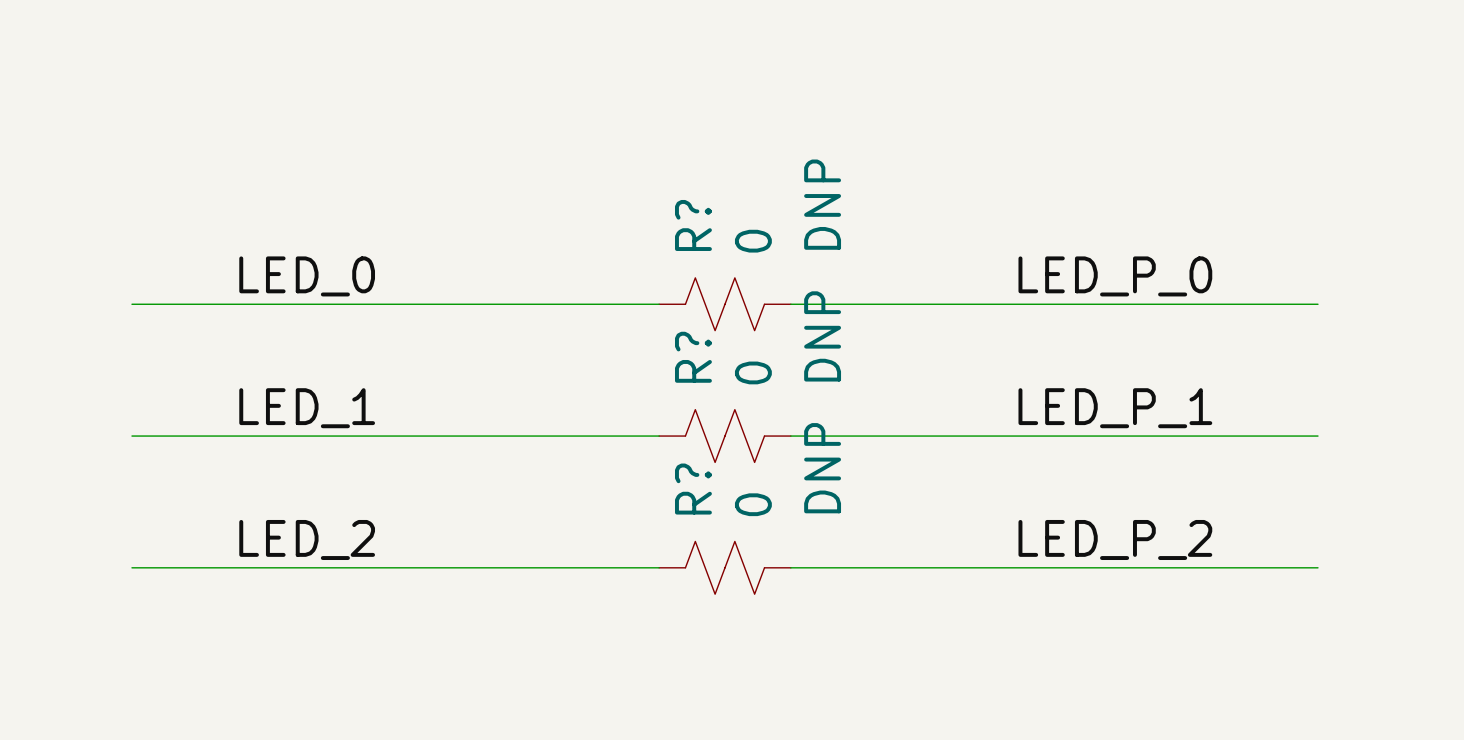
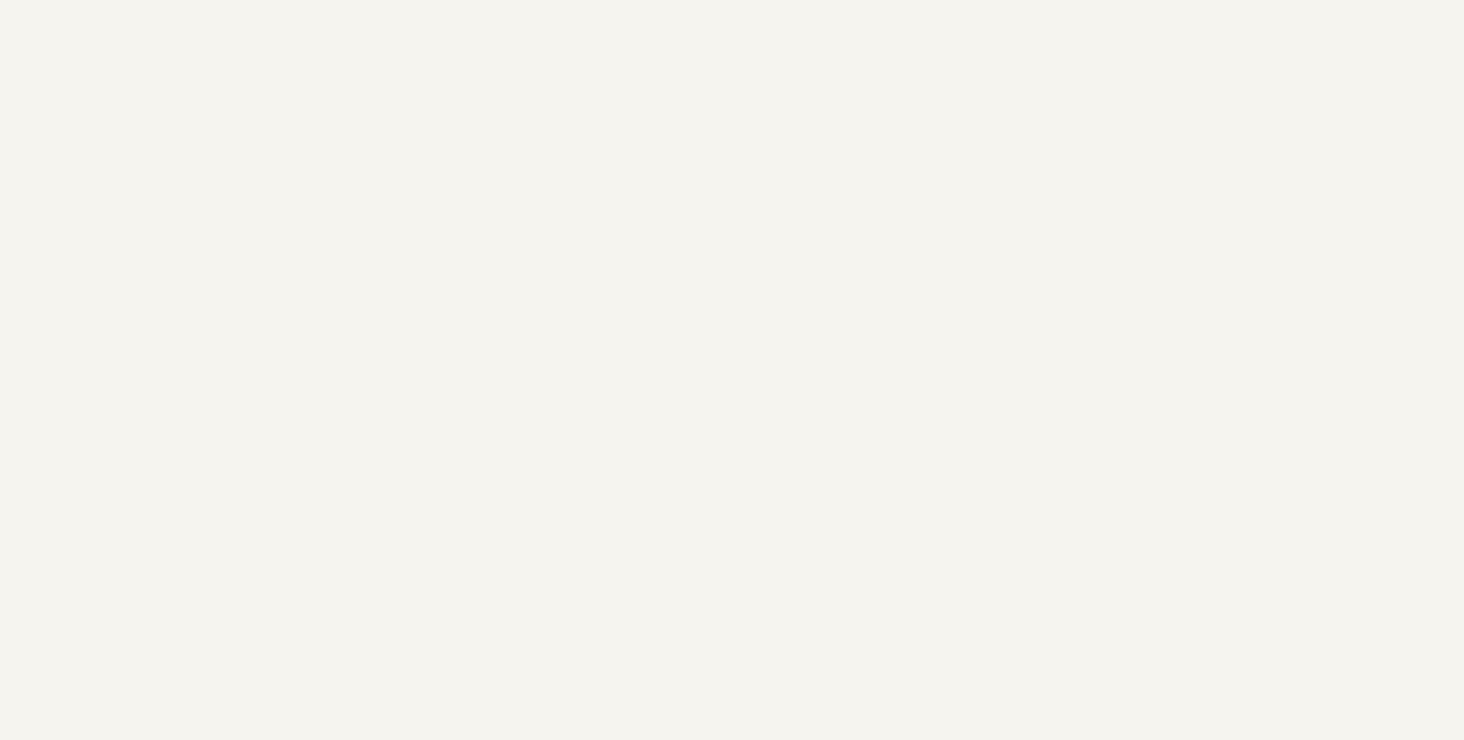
label: LED_0 (307, 276) -> none
label: LED_P_0 (1115, 276) -> none
wire: (131, 304) (659, 304) -> none
R?: 0 (724, 304) -> none
wire: (790, 304) (1317, 304) -> none
label: LED_1 (307, 408) -> none
label: LED_P_1 (1115, 408) -> none
wire: (131, 436) (659, 436) -> none
R?: 0 (724, 436) -> none
wire: (790, 436) (1317, 436) -> none
label: LED_2 (307, 539) -> none
label: LED_P_2 (1115, 539) -> none
wire: (131, 567) (659, 567) -> none
R?: 0 (724, 567) -> none
wire: (790, 567) (1317, 567) -> none

